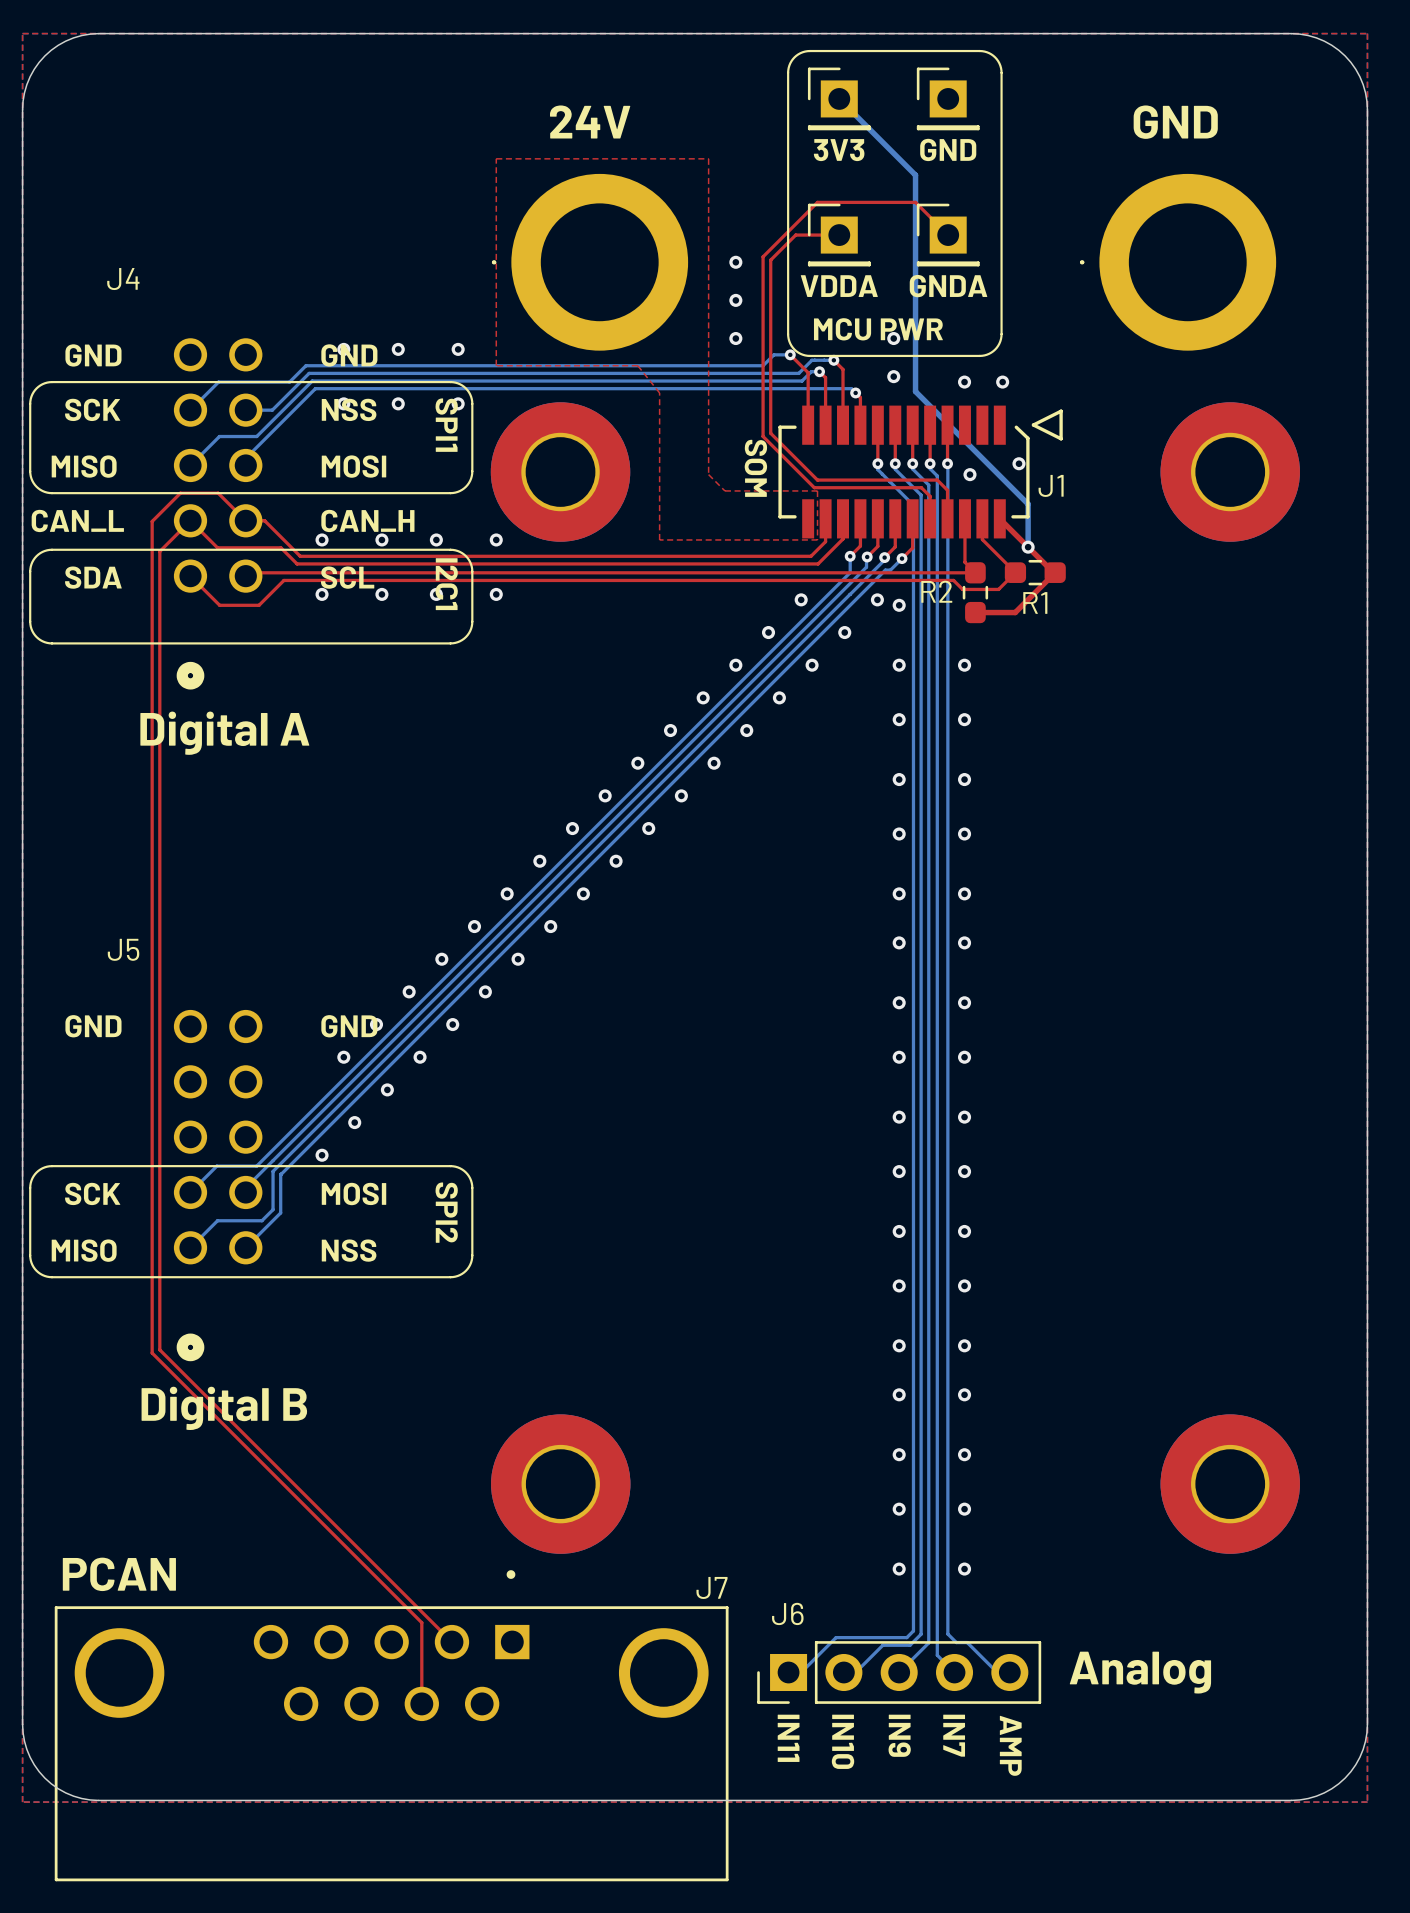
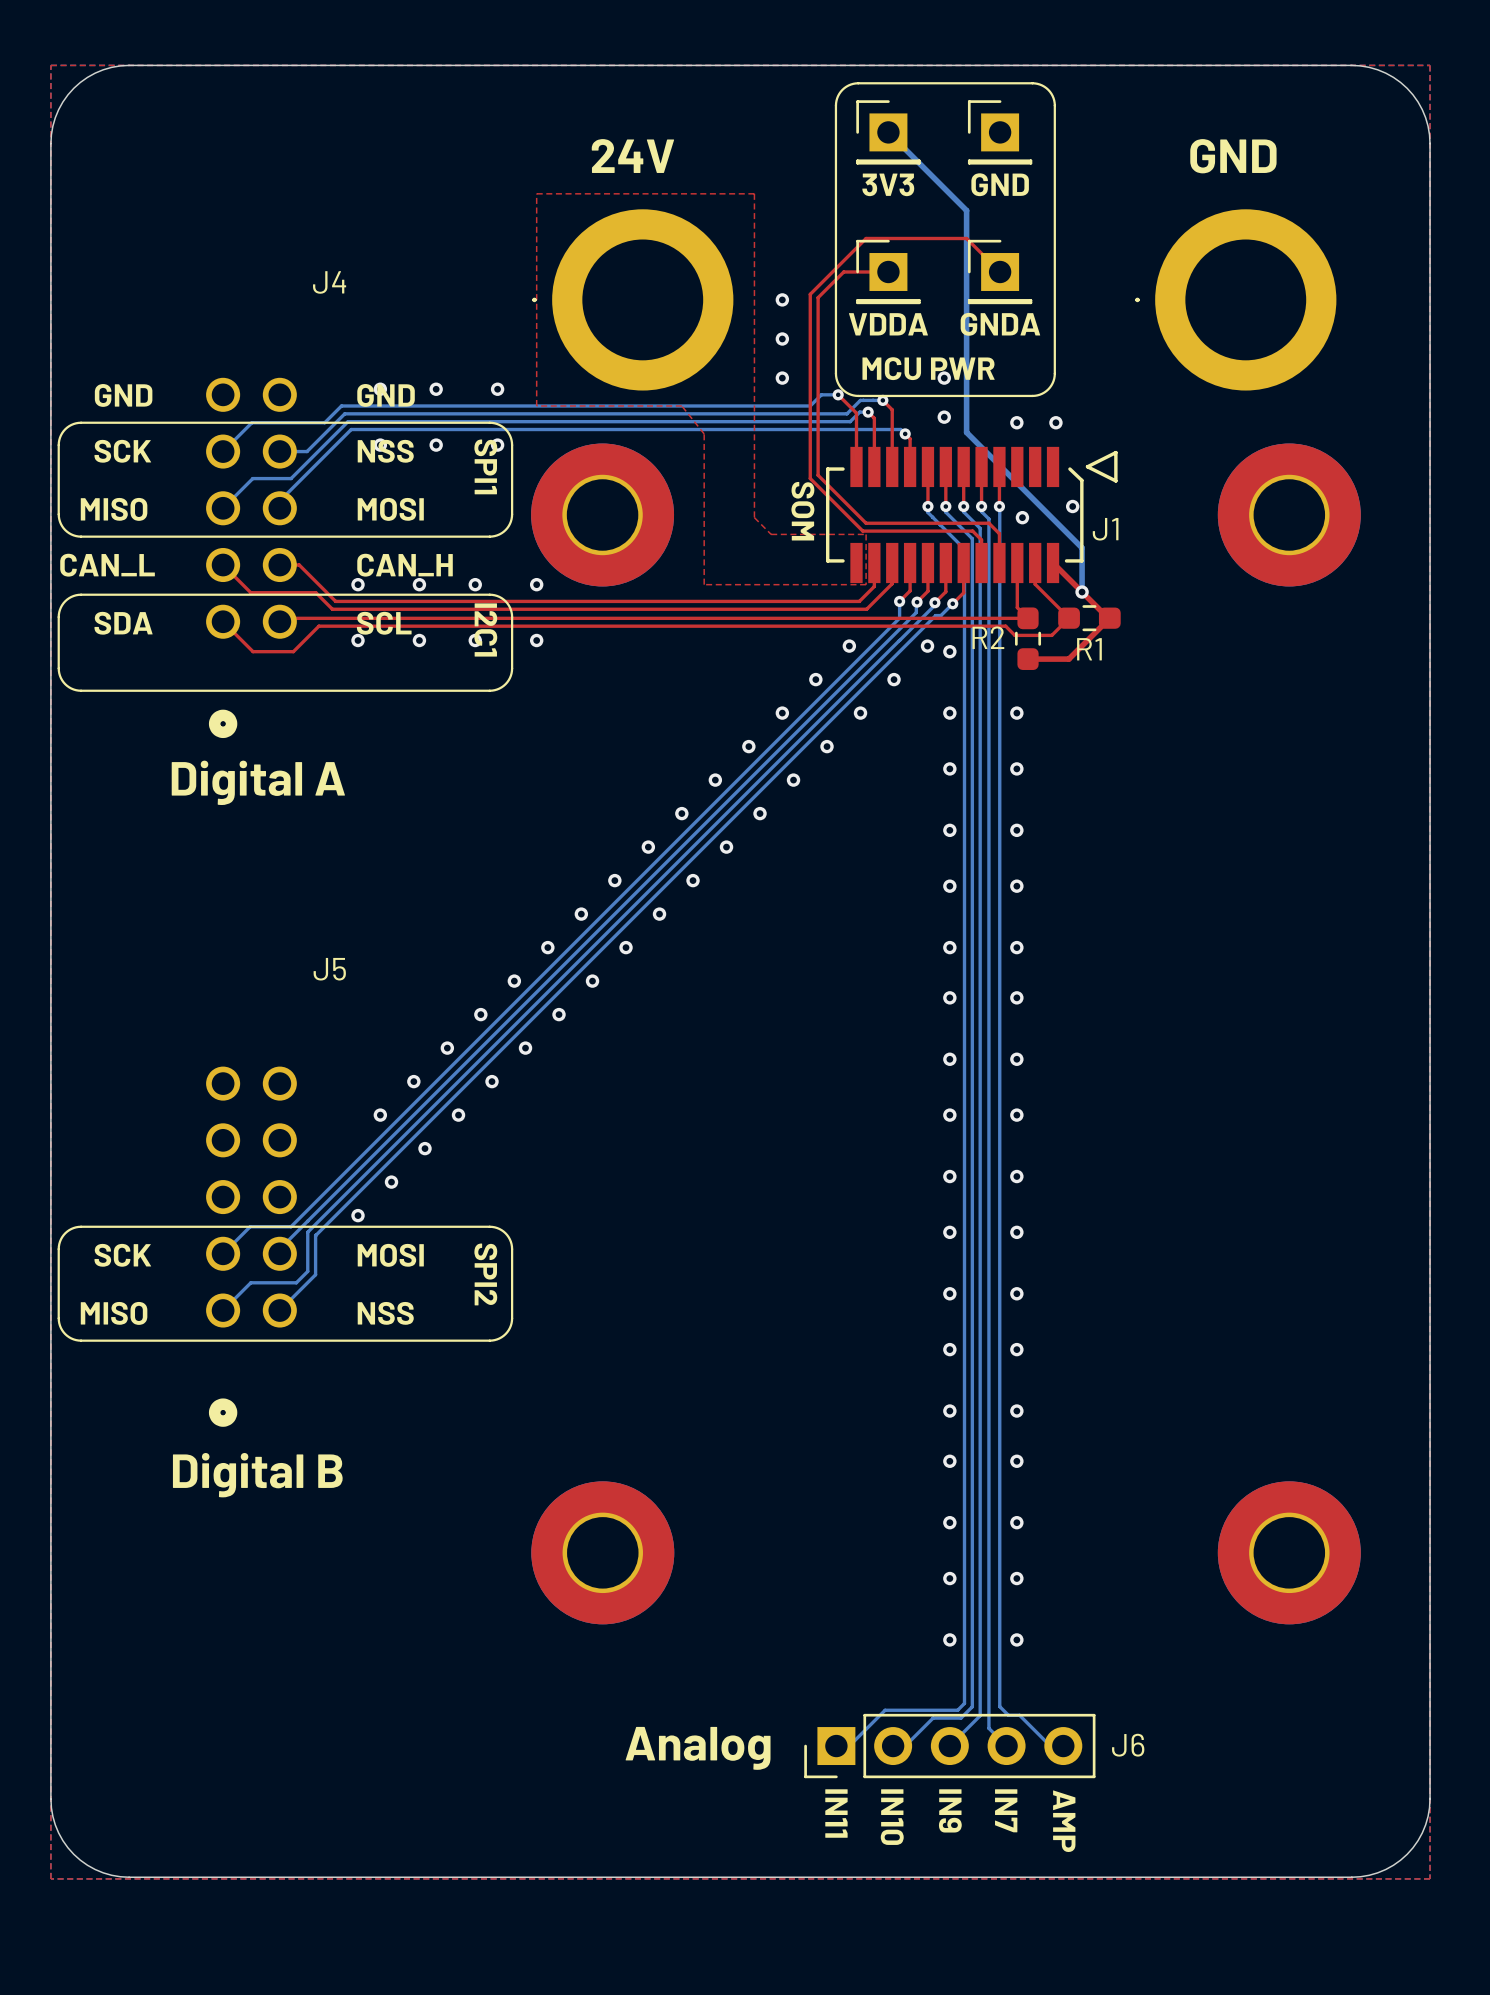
J4 name position: J4 (123, 279) -> J4 (329, 282)
top track: (190, 520) (159, 551) (159, 1349) (451, 1642) -> none
top track: (245, 520) (218, 493) (180, 493) (152, 521) (152, 1353) (421, 1622) (421, 1703) -> none
J5 name position: J5 (123, 949) -> J5 (329, 969)
text: GND (93, 1026) -> none
text: GND (349, 1026) -> none
J6 name position: J6 (787, 1613) -> J6 (1128, 1745)
J6 value position: Analog (1140, 1672) -> Analog (698, 1748)
J7: PCAN (391, 1725) -> none

